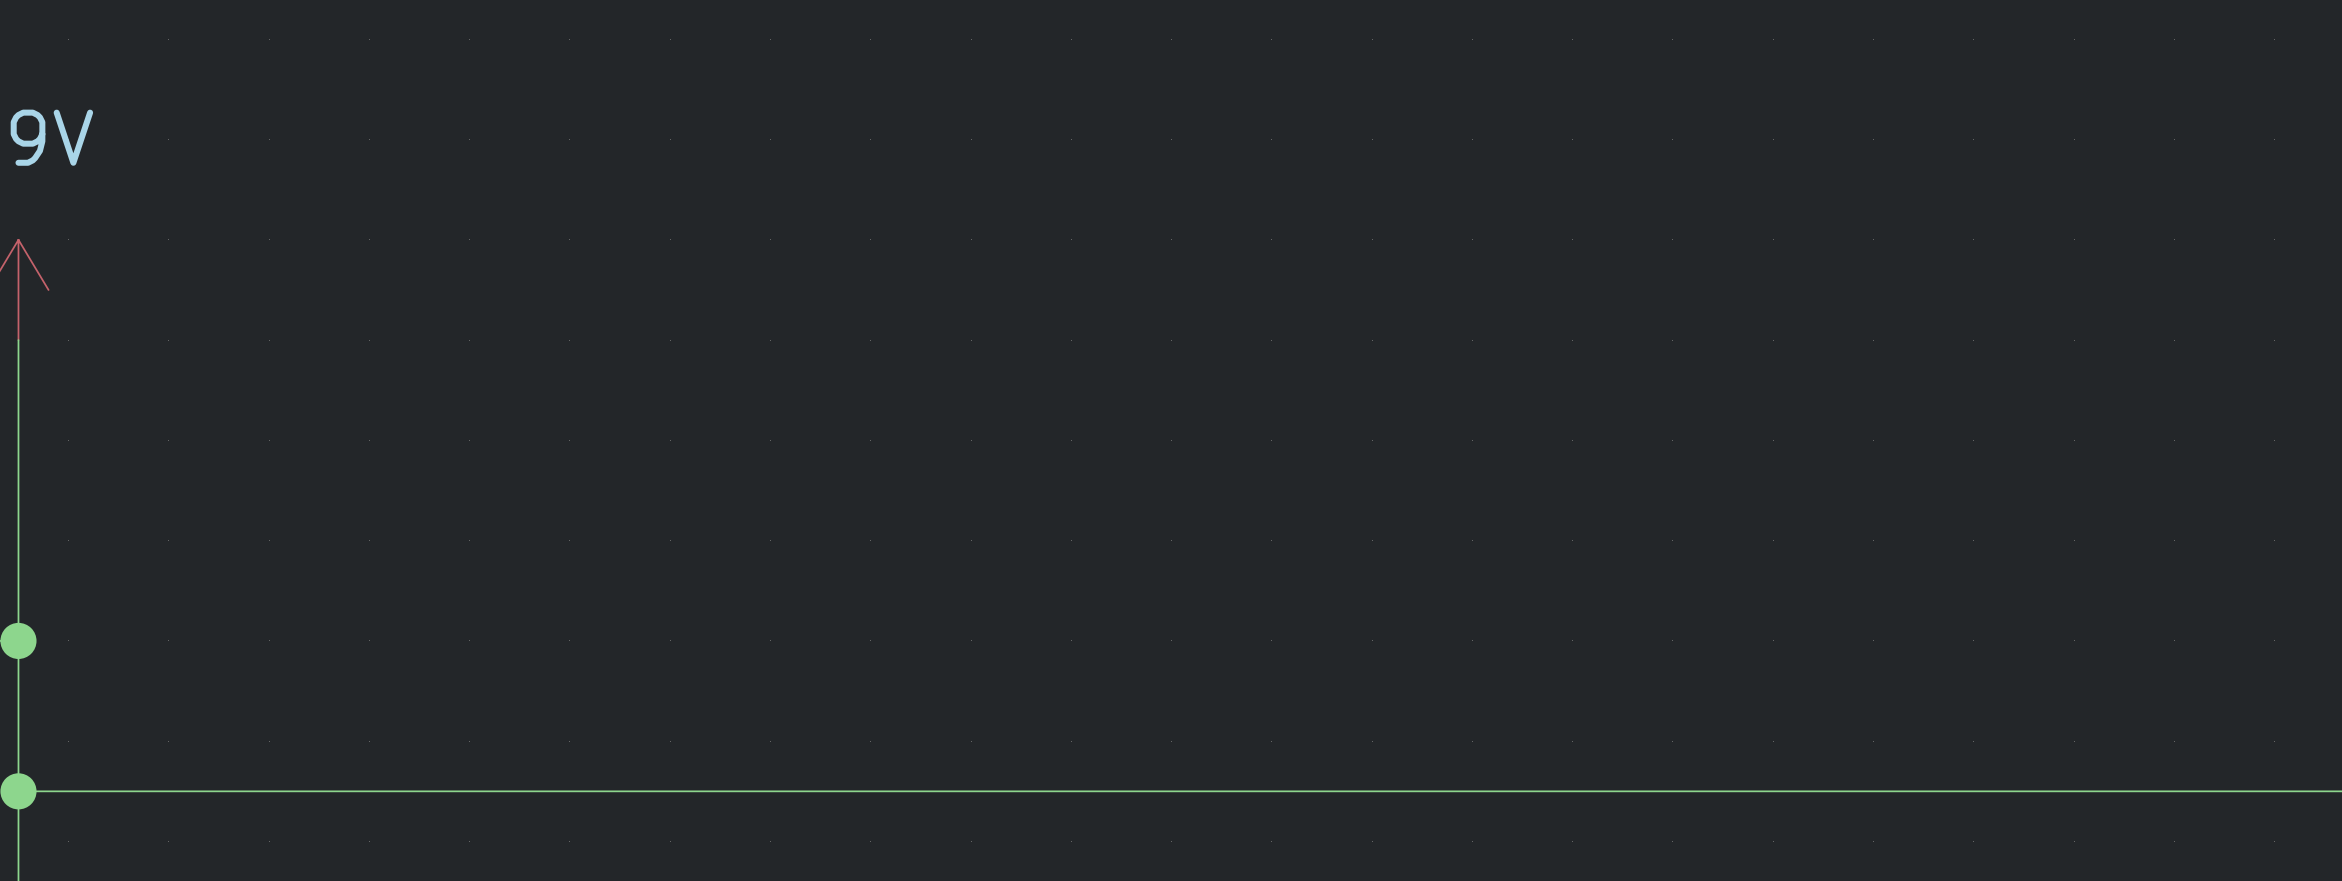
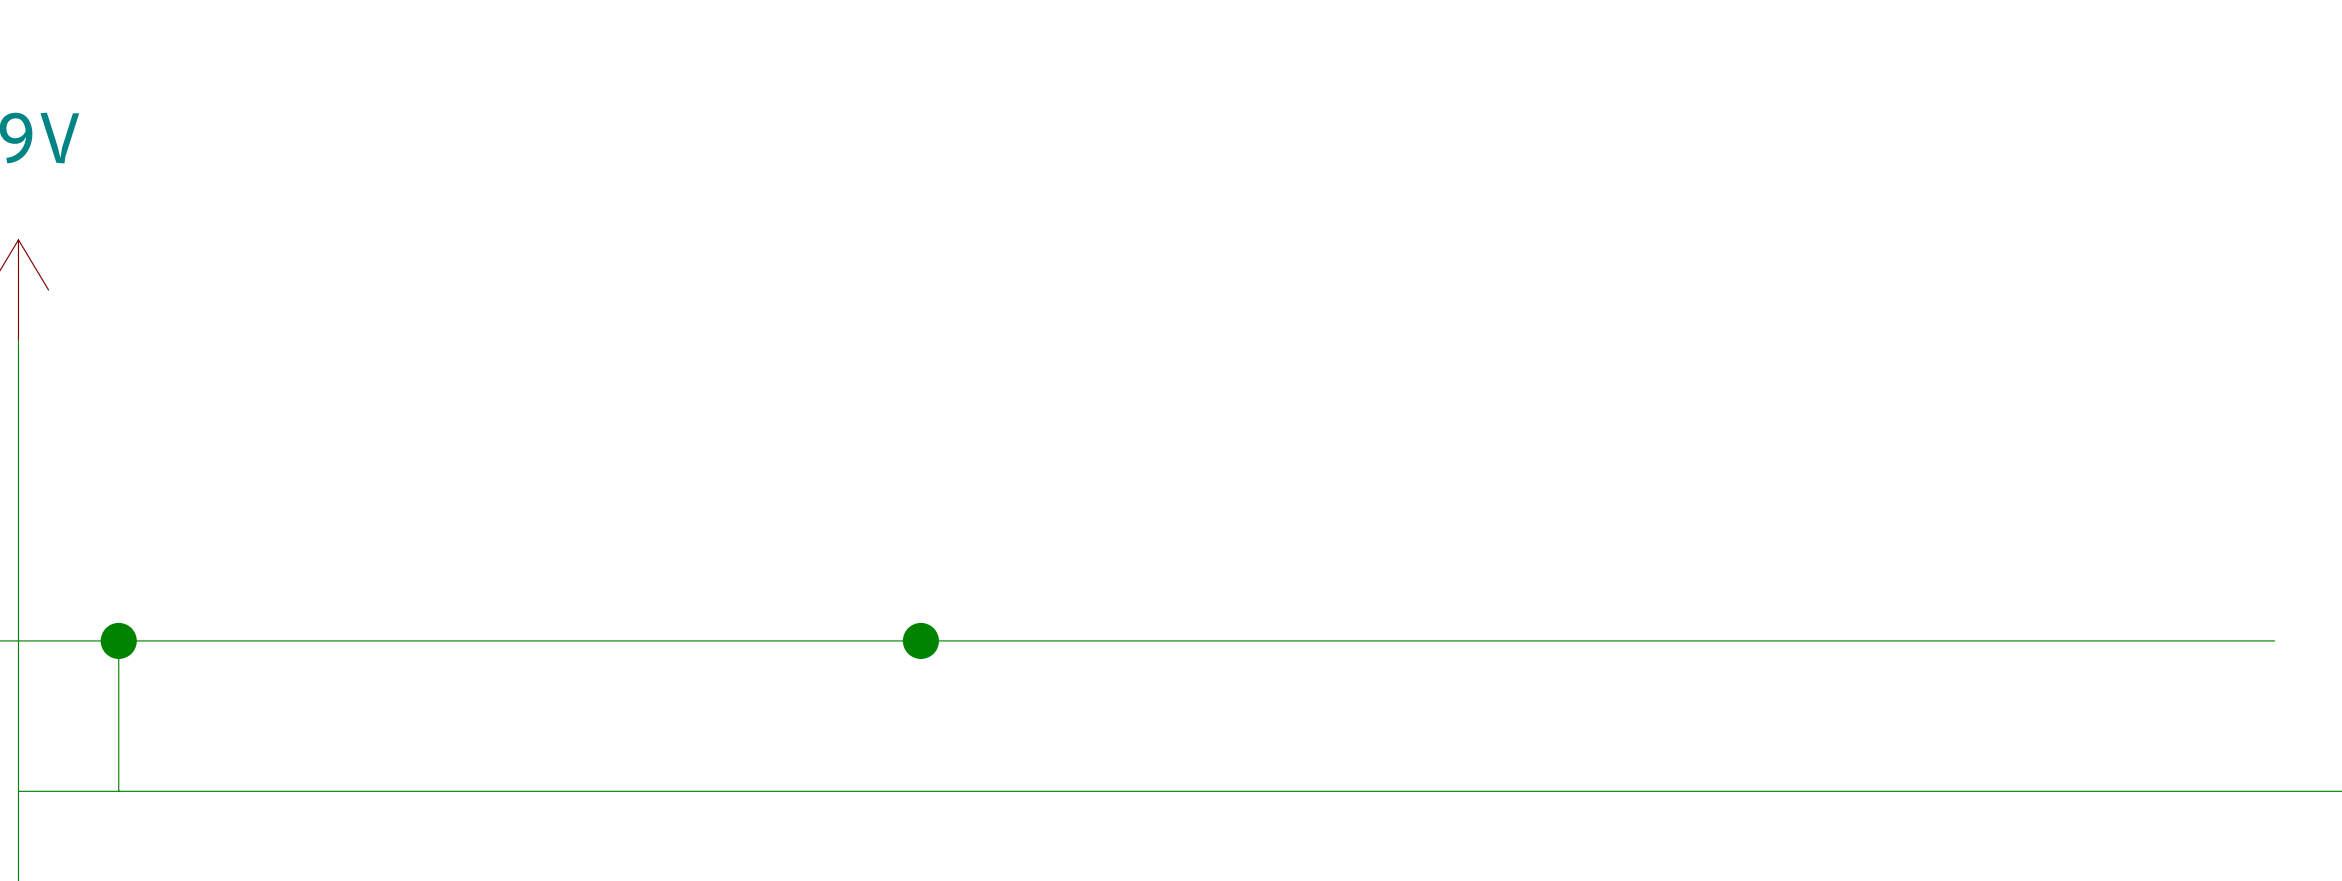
wire: none -> (18, 640) (2274, 640)
junction: (18, 640) -> none
wire: none -> (118, 640) (118, 791)
junction: none -> (118, 640)
junction: none -> (920, 640)
junction: (18, 791) -> none

